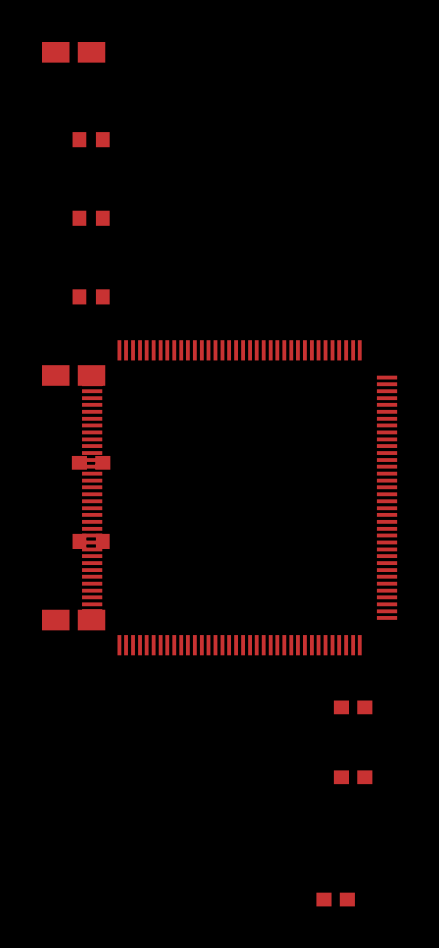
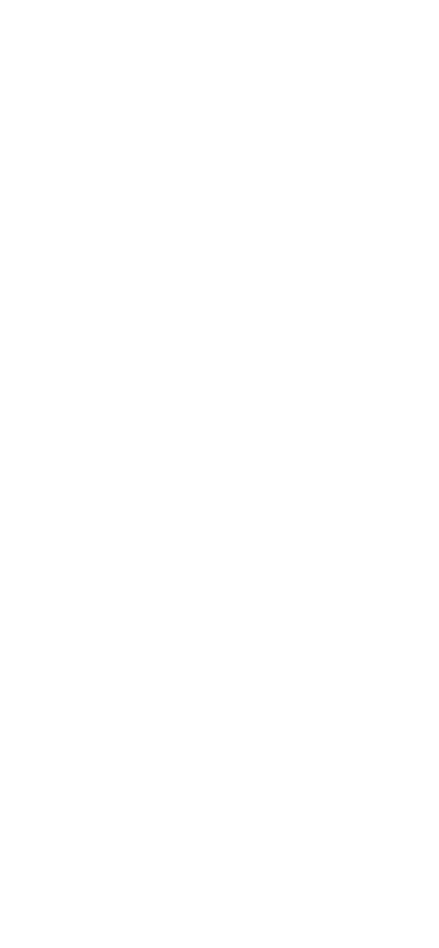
part: (73, 52) -> none
part: (91, 139) -> none
part: (91, 218) -> none
part: (91, 296) -> none
part: (73, 375) -> none
part: (91, 462) -> none
part: (239, 497) -> none
part: (91, 541) -> none
part: (73, 620) -> none
part: (353, 707) -> none
part: (353, 777) -> none
part: (335, 899) -> none

